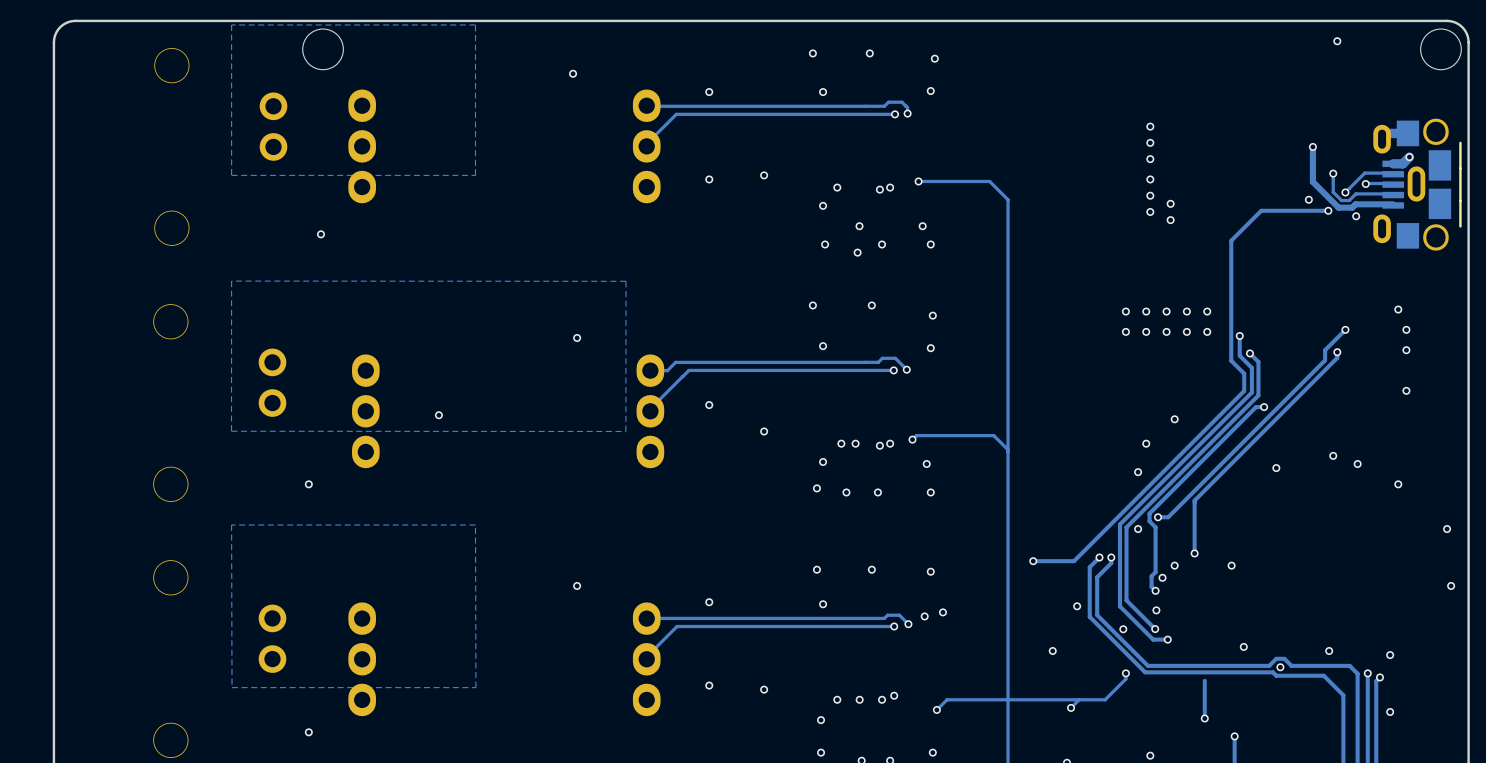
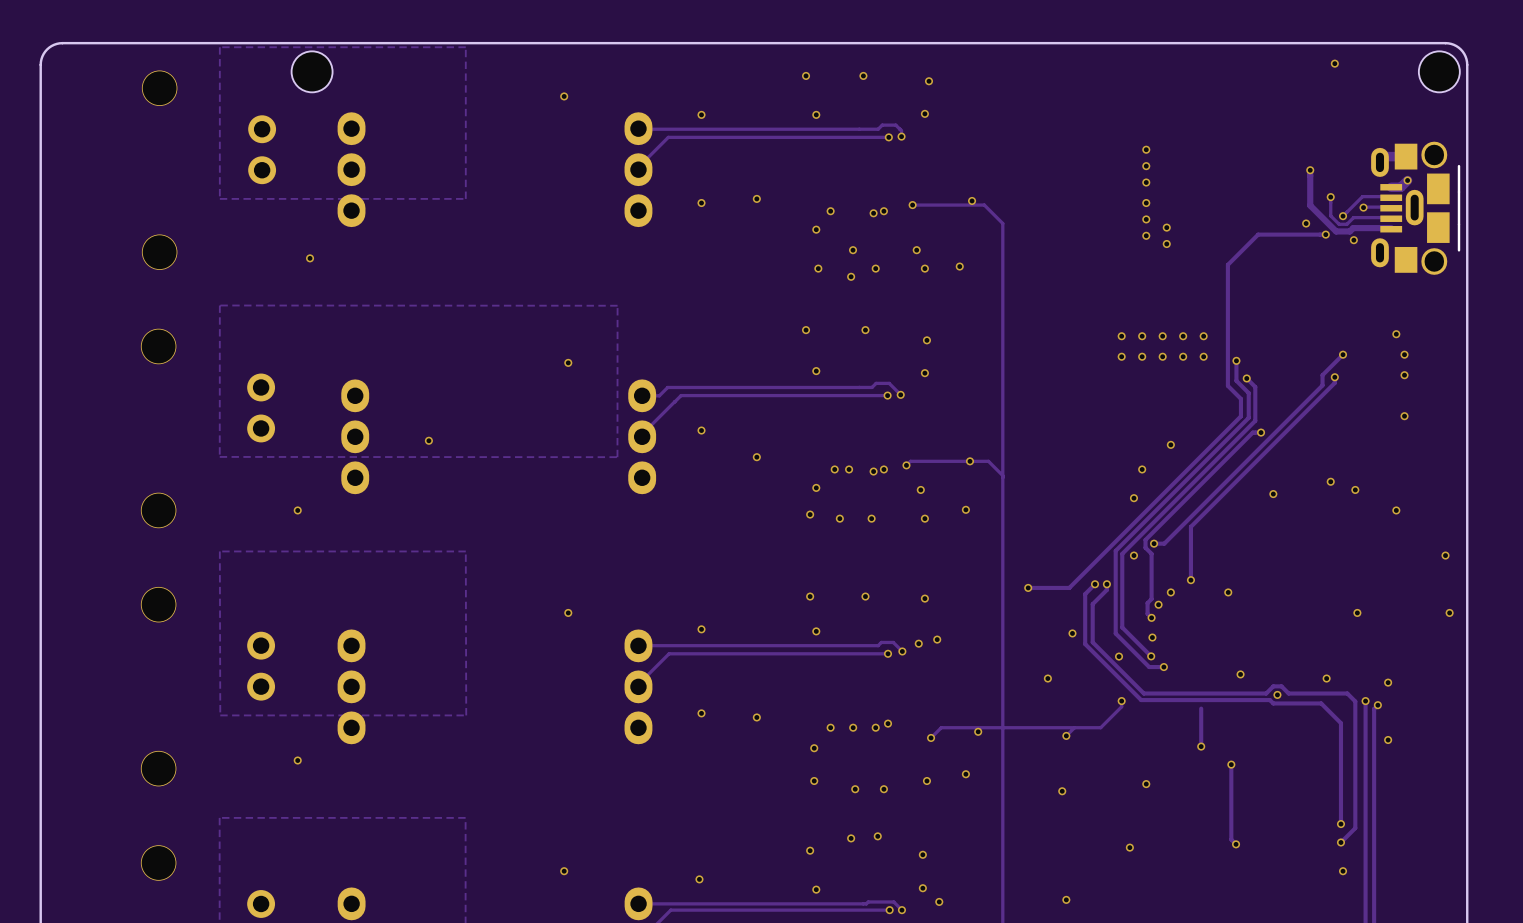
via: none -> (972, 200)
via: none -> (959, 266)
via: none -> (970, 461)
via: none -> (965, 509)
via: none -> (1357, 612)
via: none -> (978, 731)
via: none -> (965, 774)

